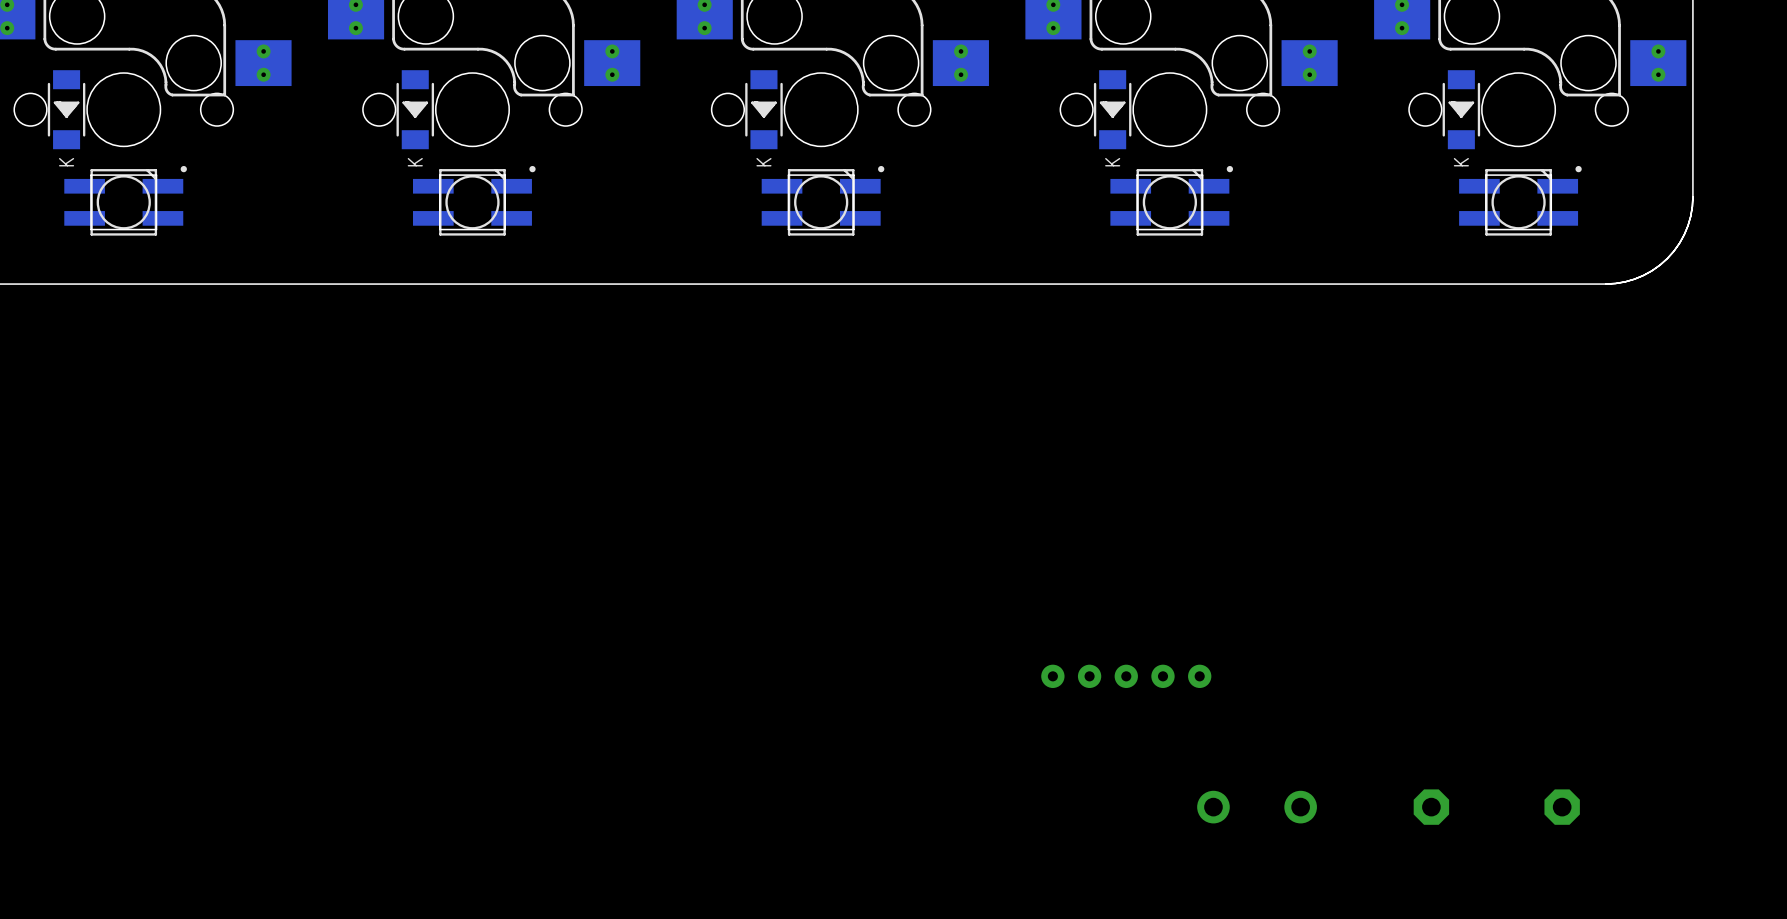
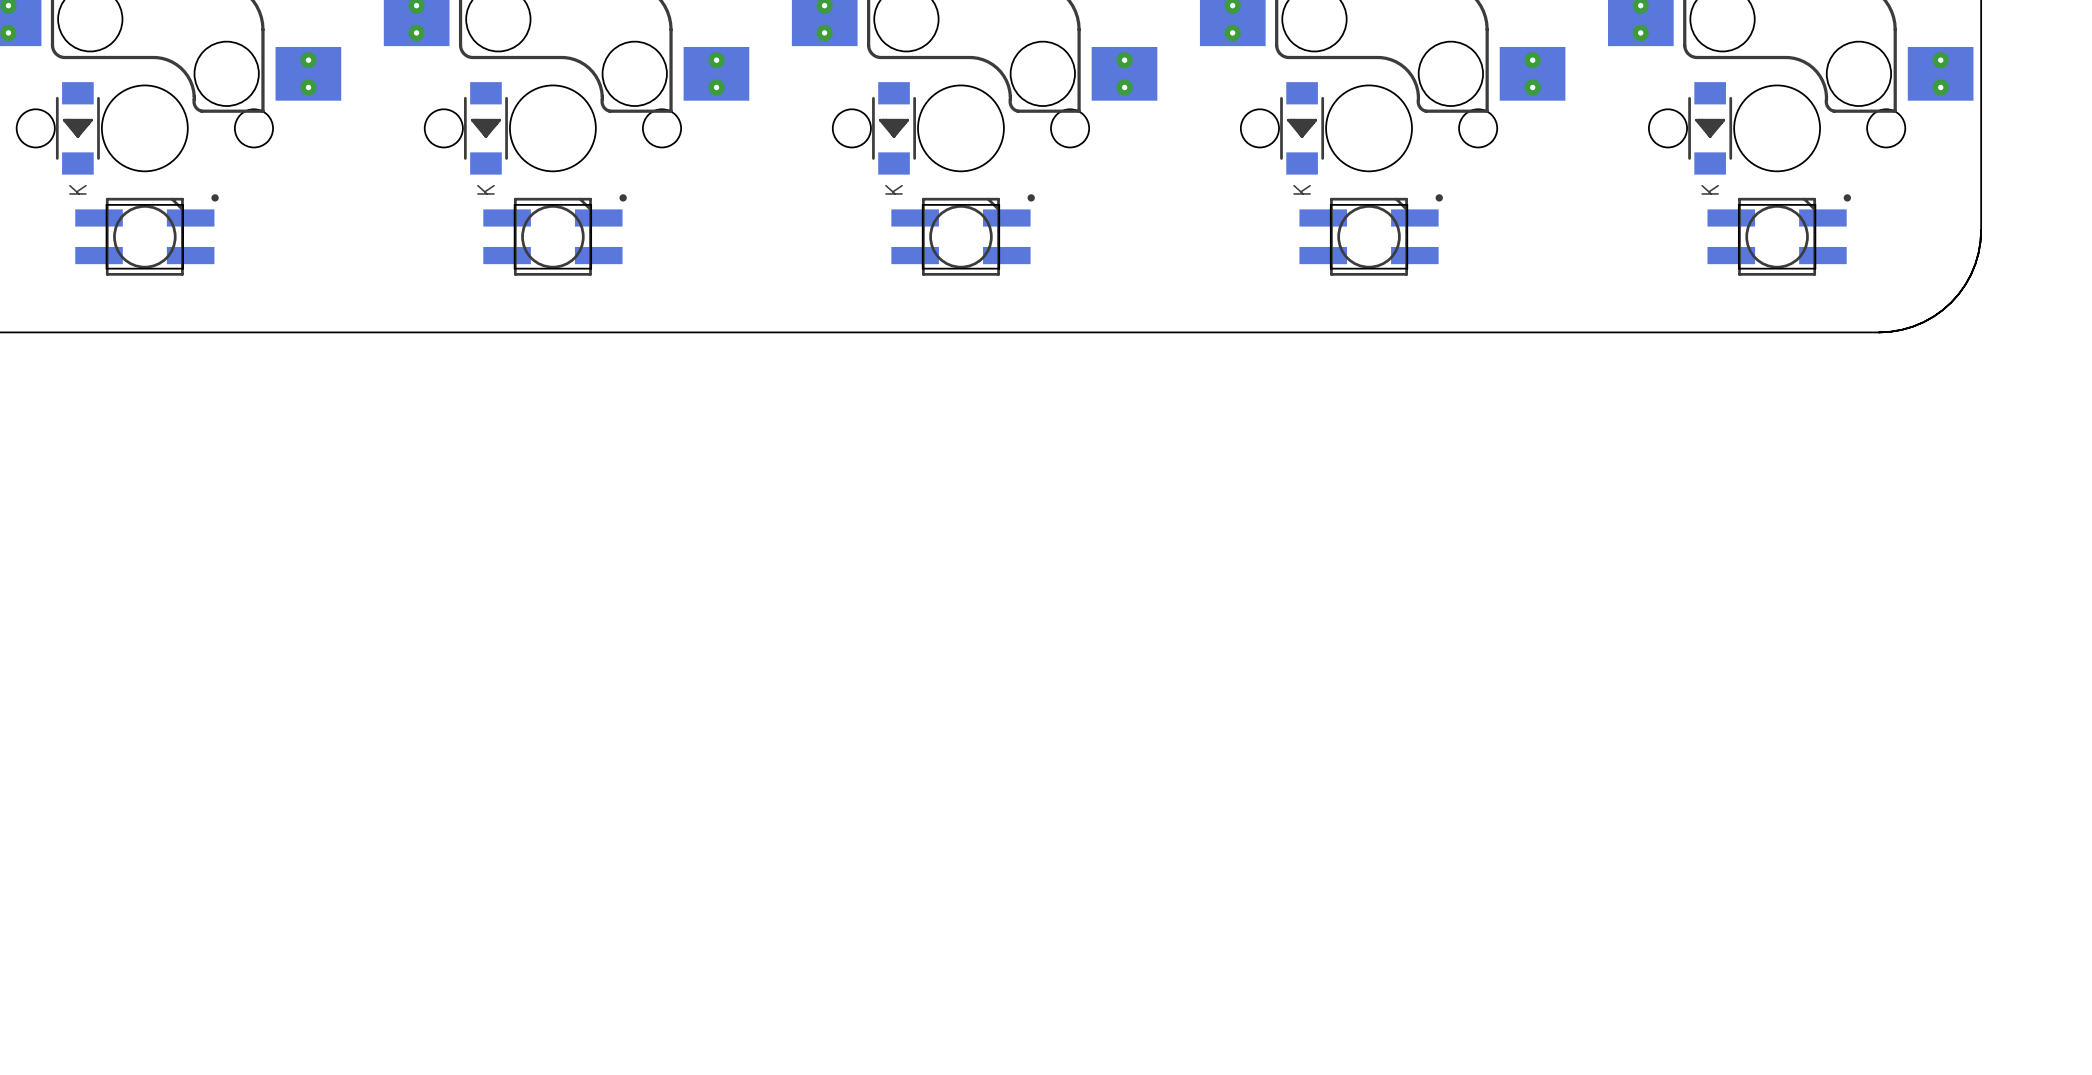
part: (1126, 676) -> none
part: (1213, 807) -> none
part: (1300, 807) -> none
part: (1431, 807) -> none
part: (1562, 807) -> none

